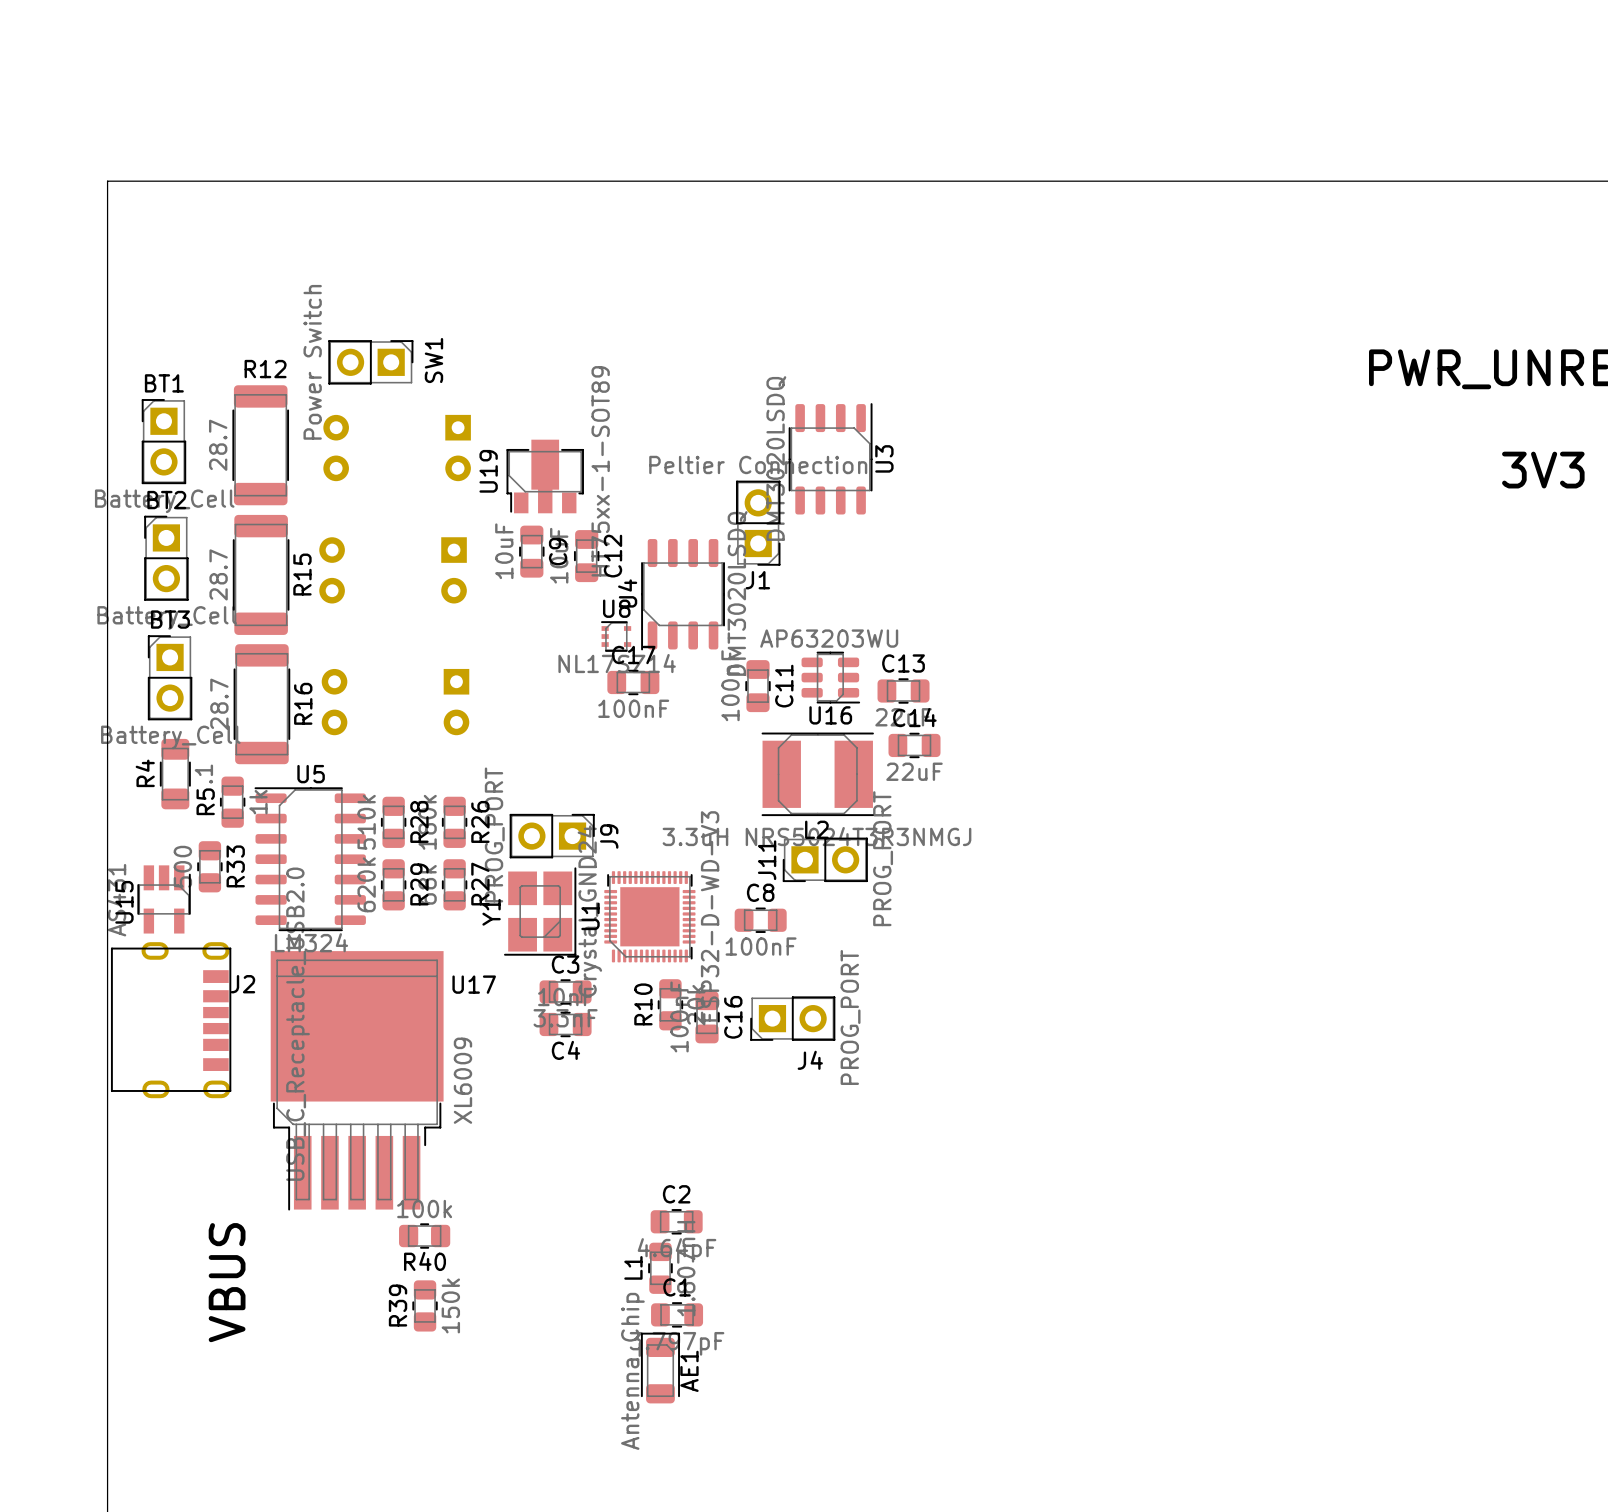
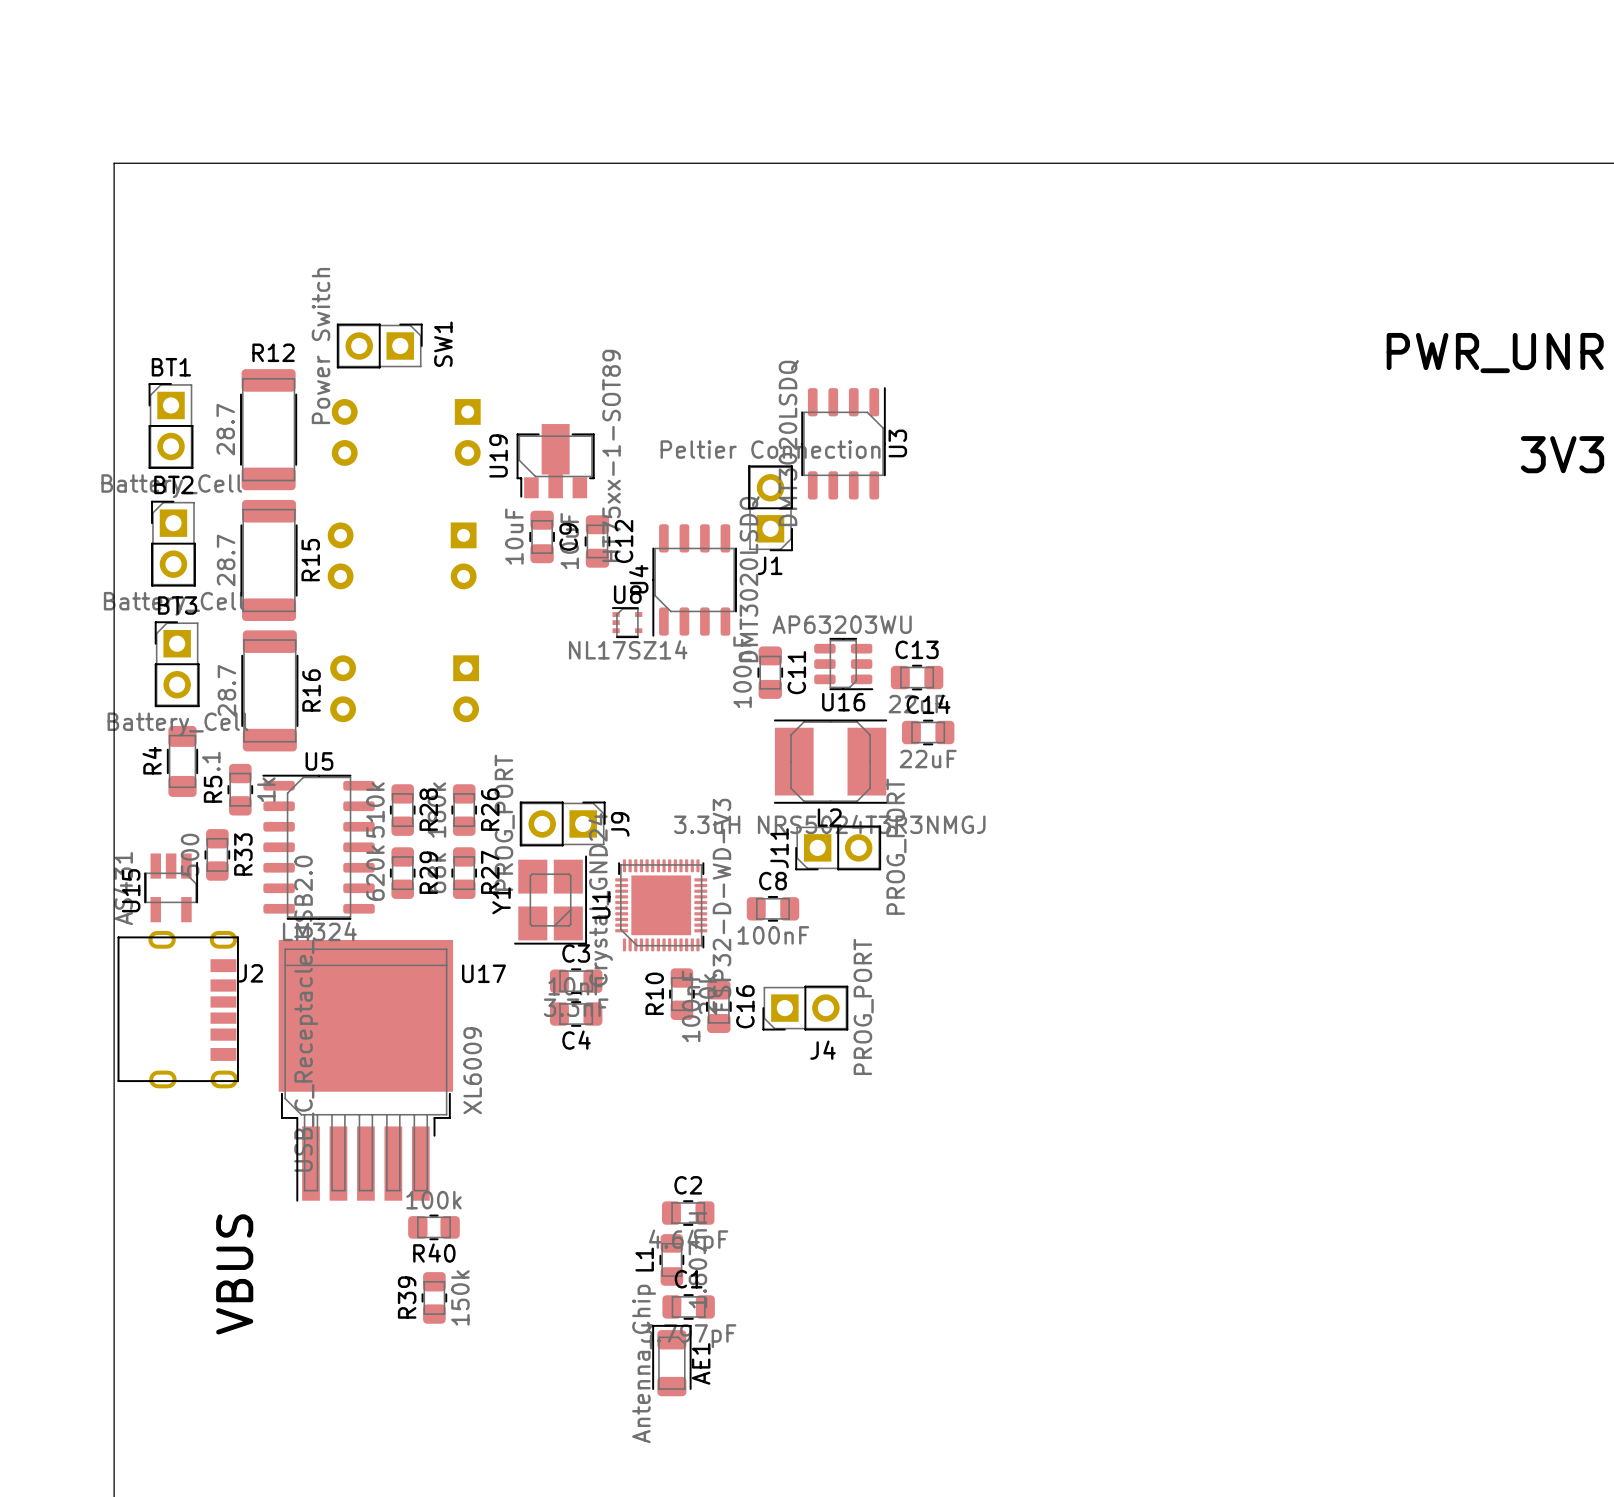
C17: 100nF (633, 682) -> none

